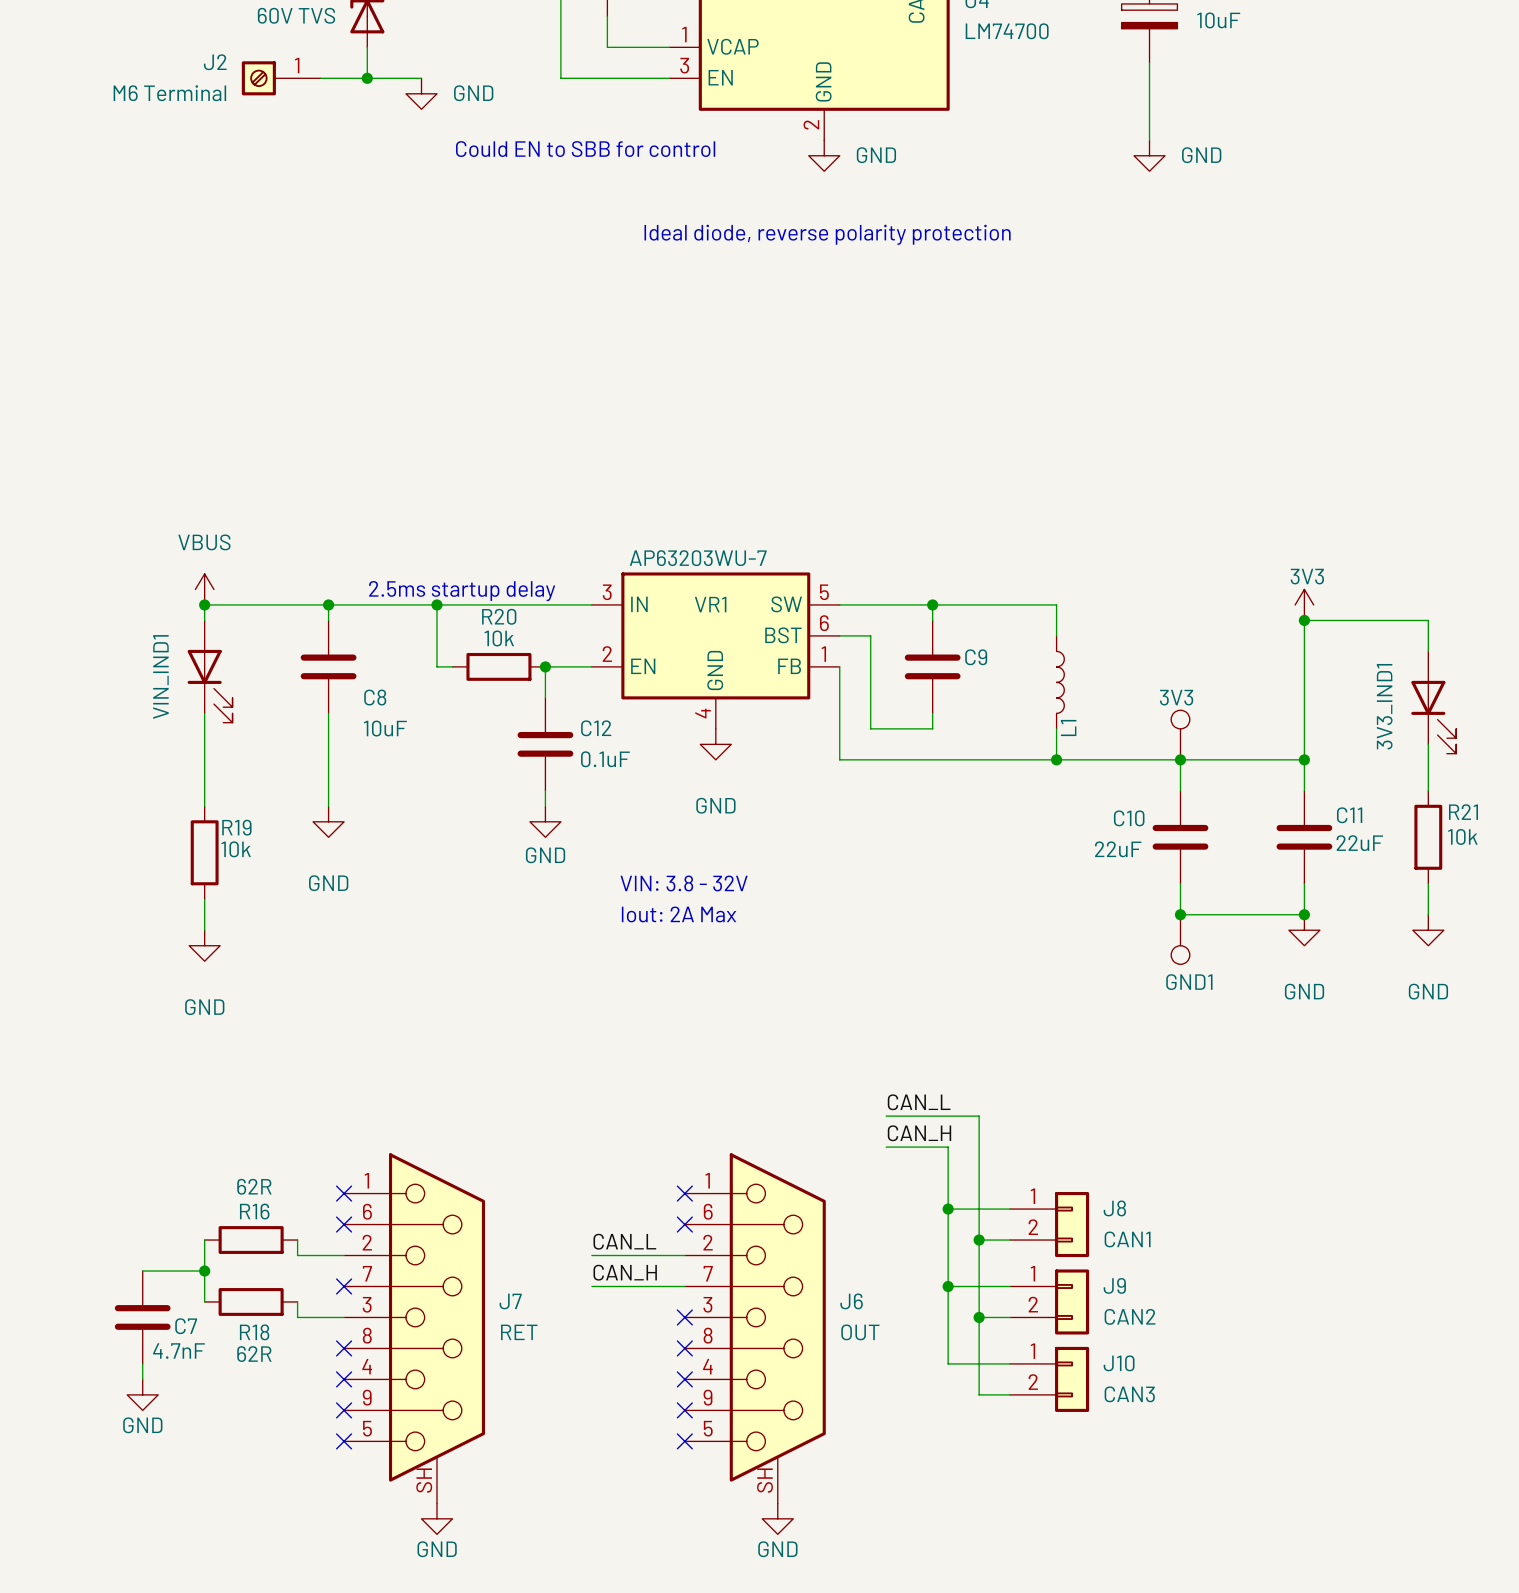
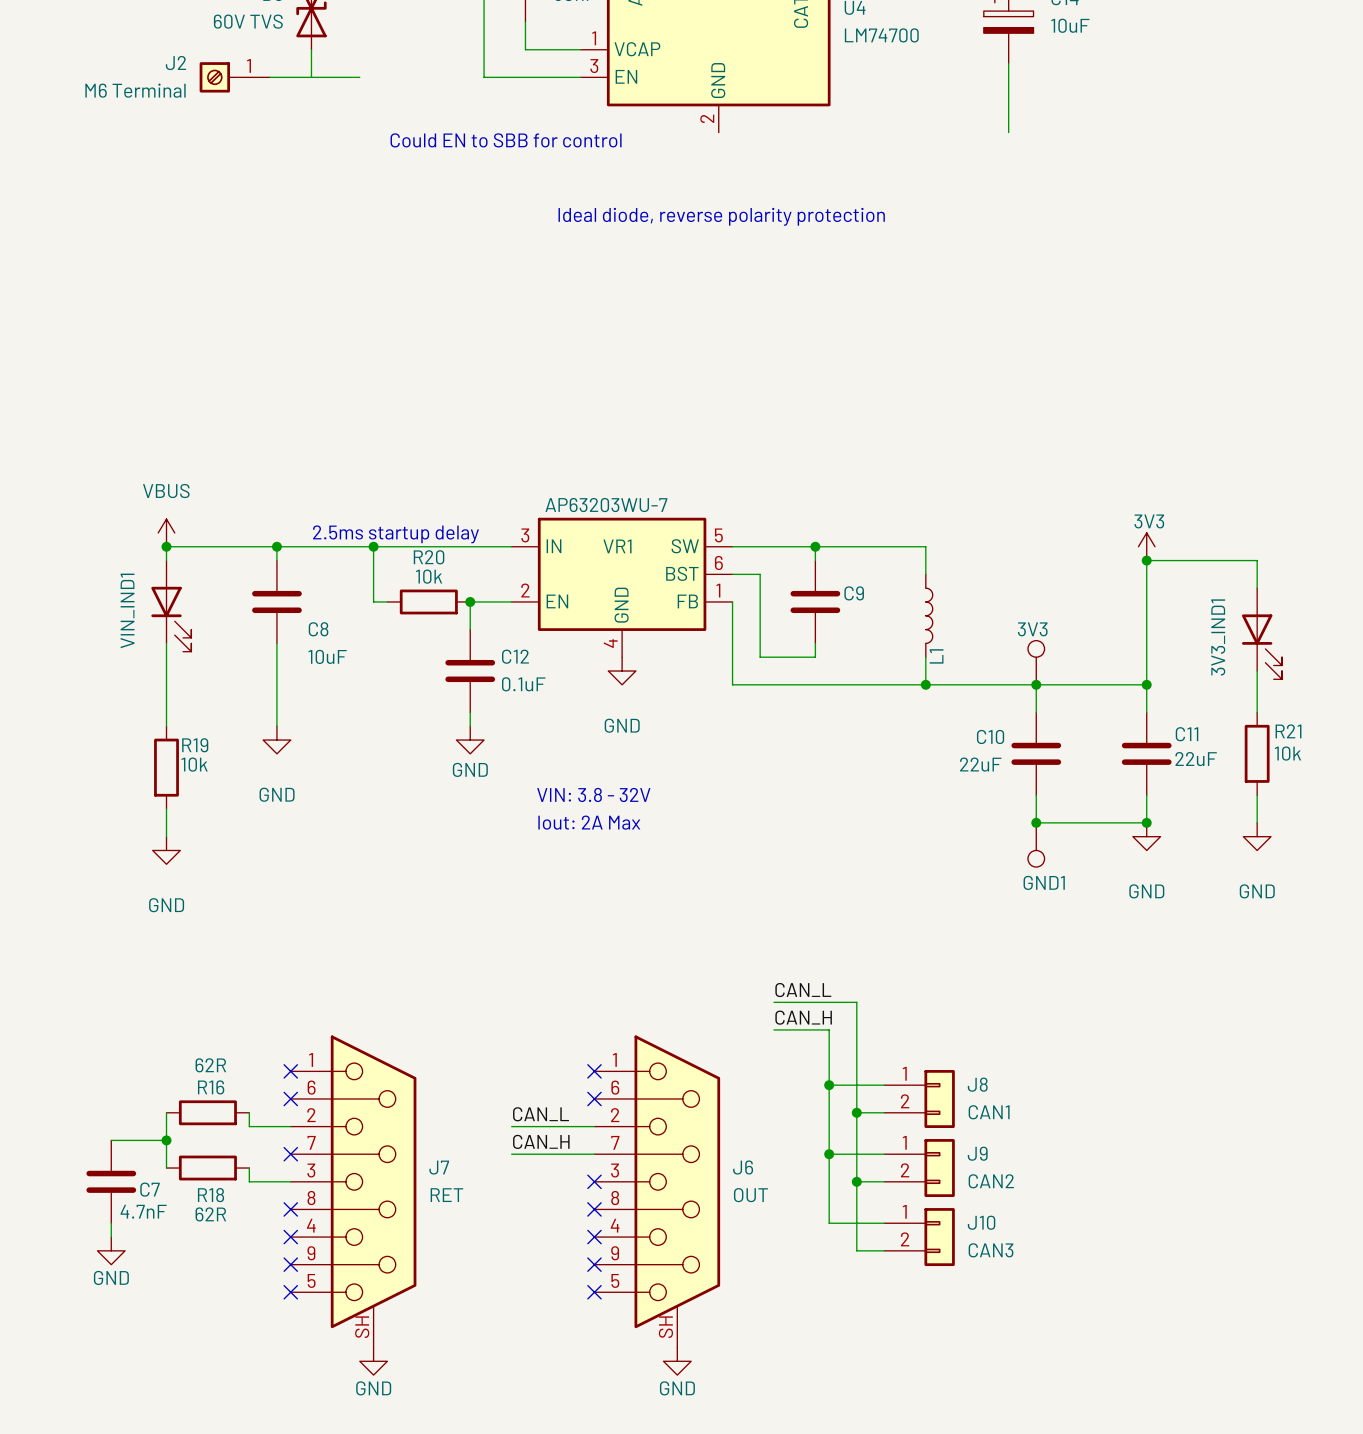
junction: (367, 78) -> none
power symbol: GND (421, 93) -> none
power symbol: GND (824, 155) -> none
power symbol: GND (1149, 155) -> none

